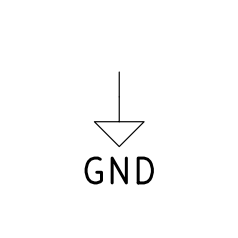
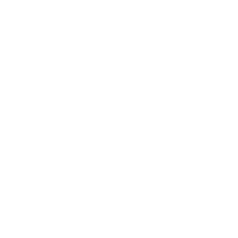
wire: (119, 72) (119, 96) -> none
power symbol: GND (119, 121) -> none

